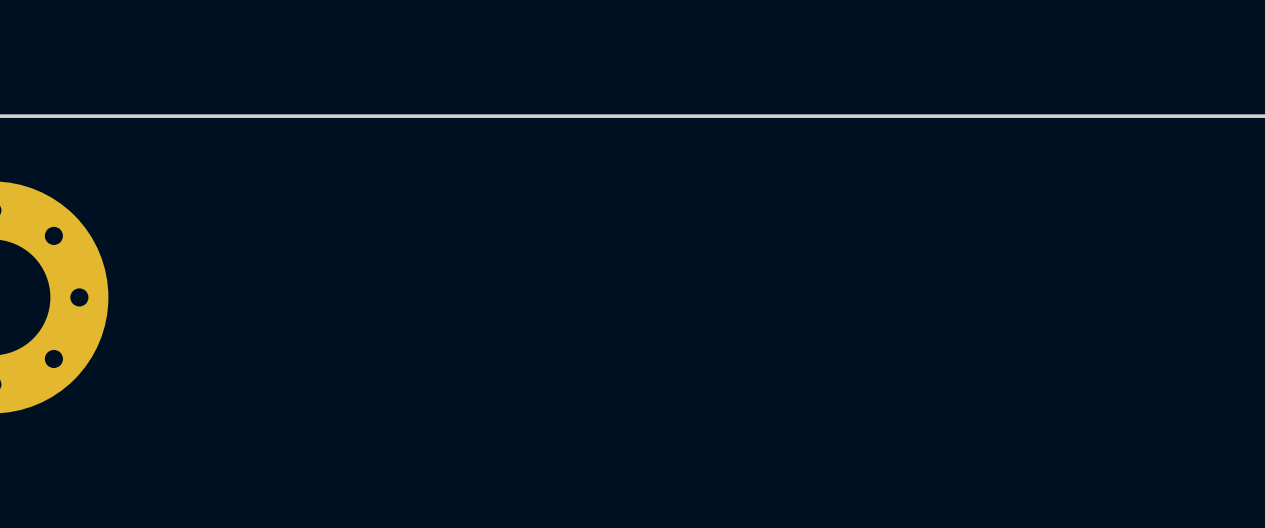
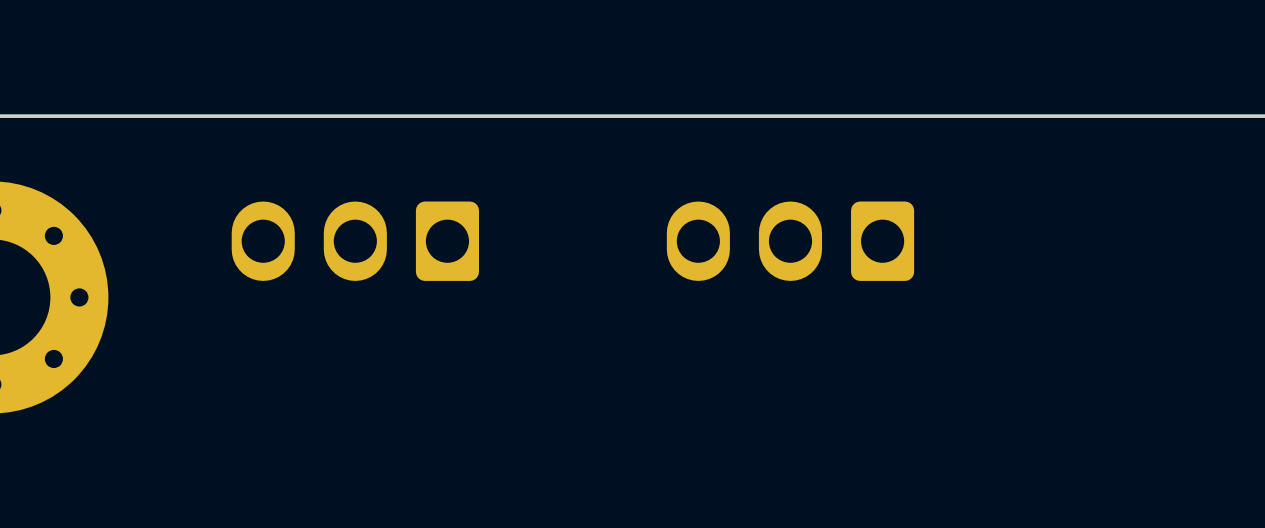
part: none -> (355, 241)
part: none -> (790, 241)

